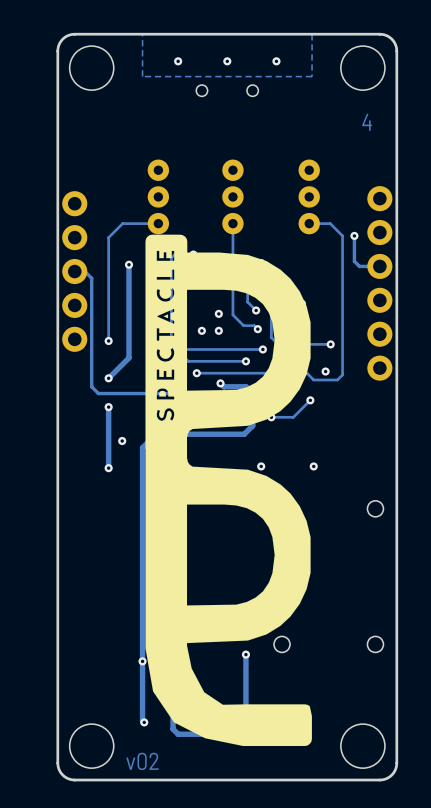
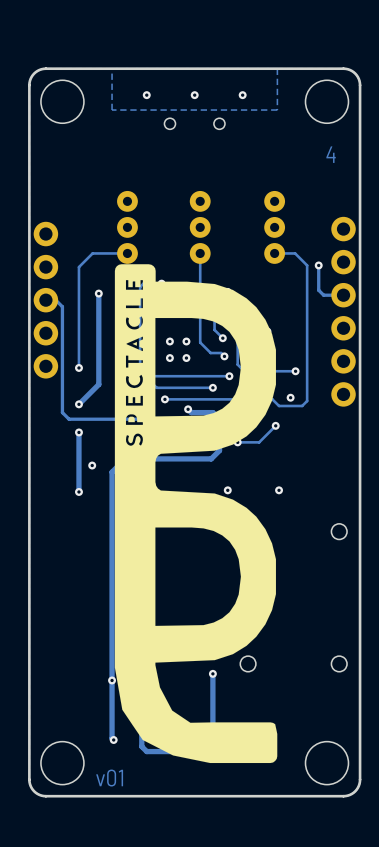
via: none -> (169, 341)
text: v02 (142, 761) -> v01 (109, 778)

